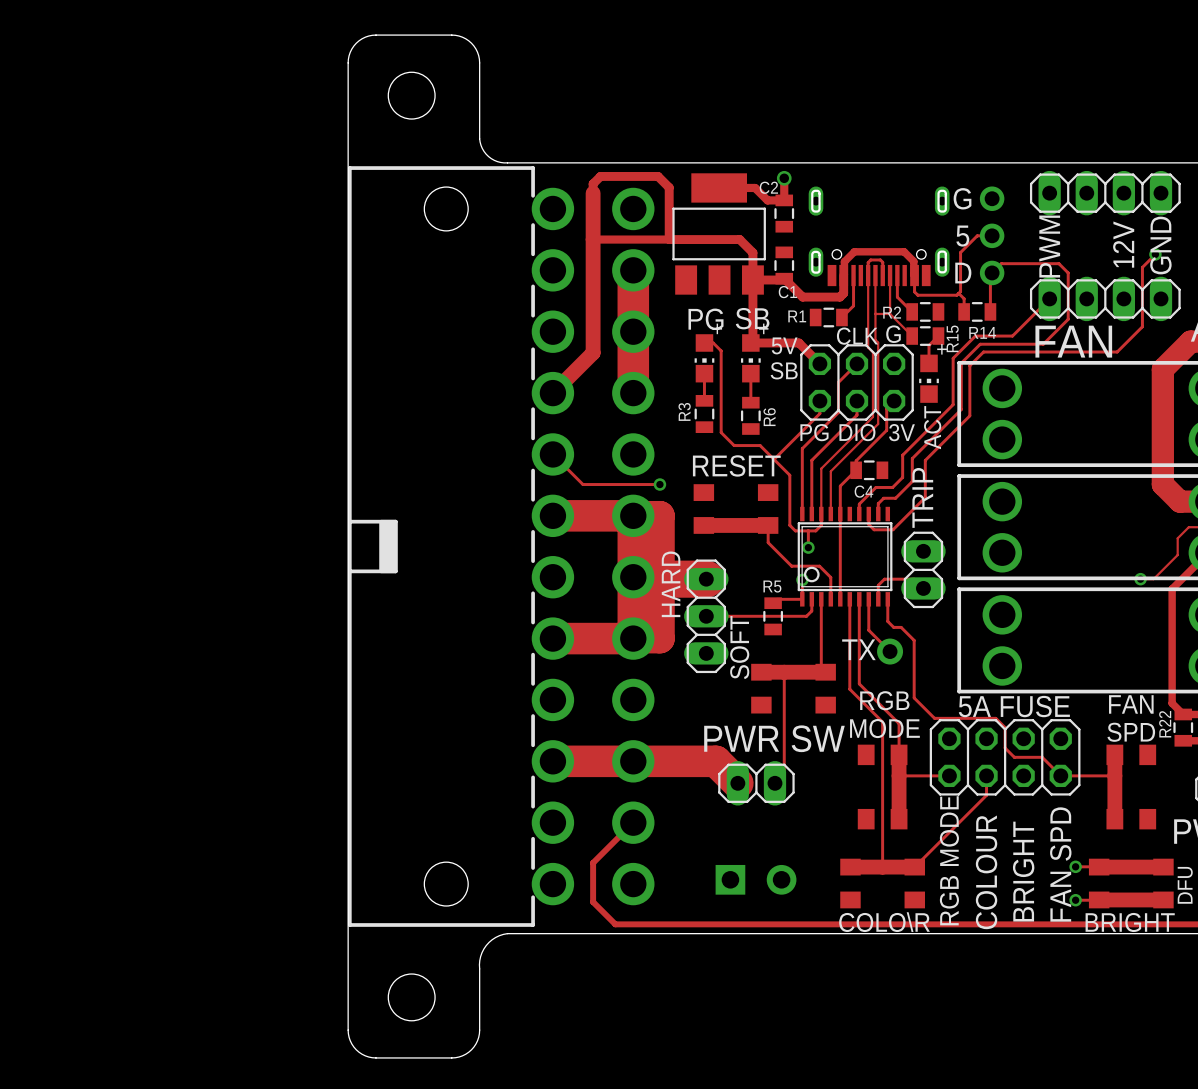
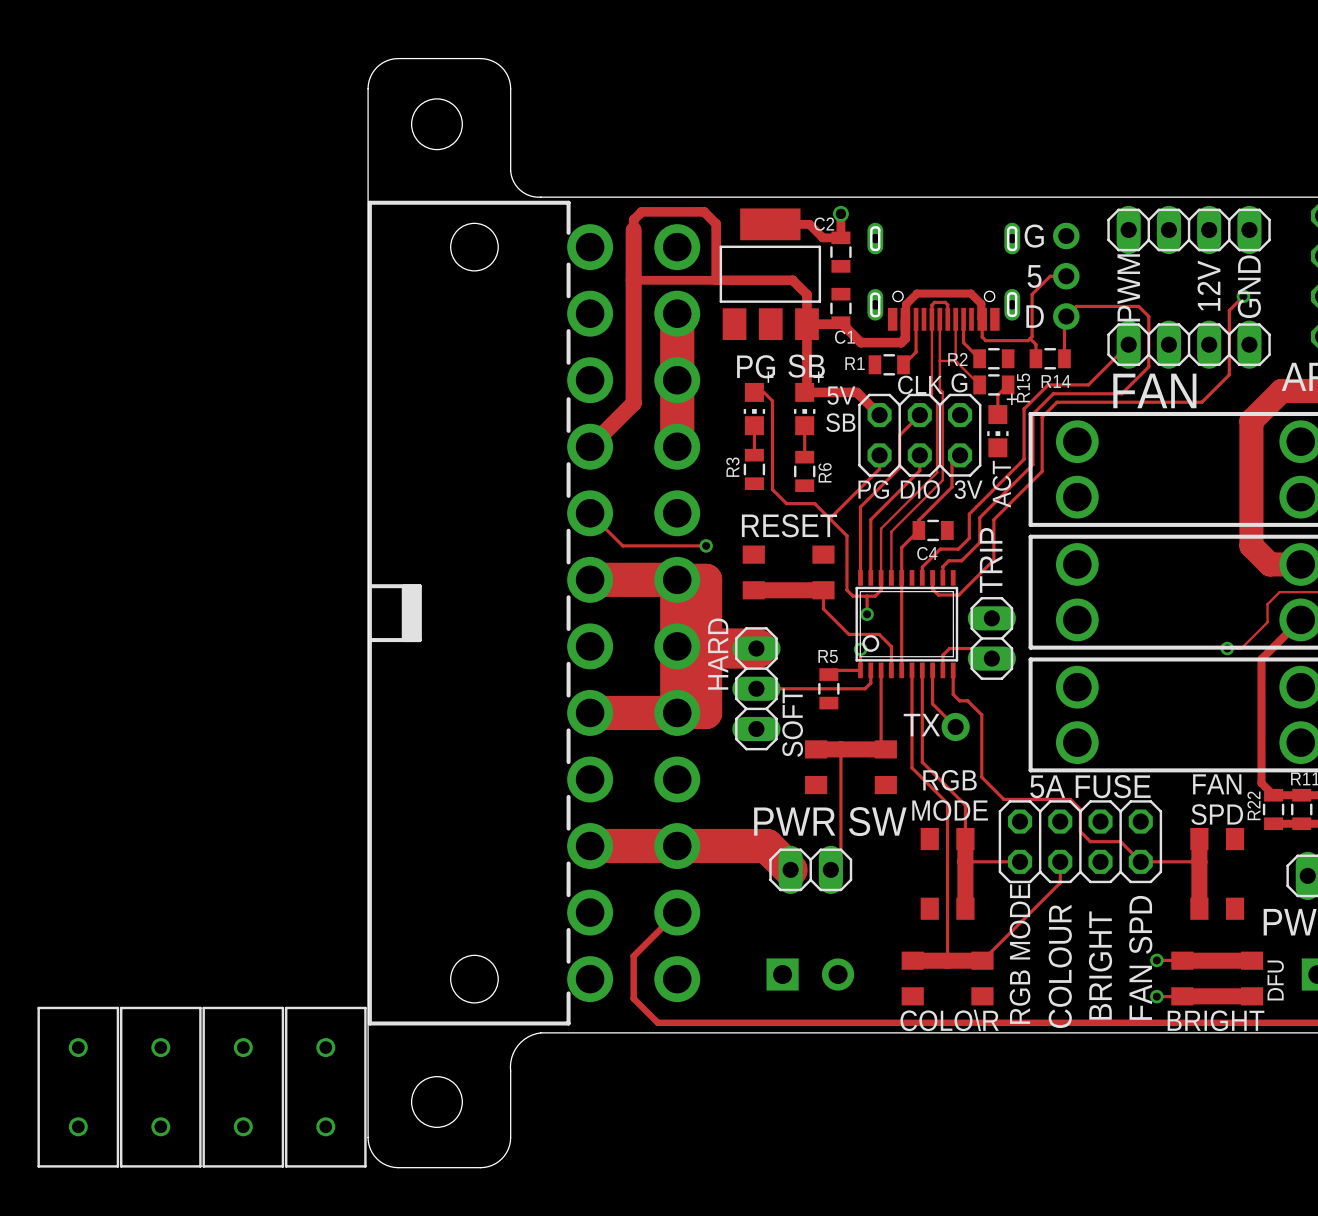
part: none -> (78, 1087)
part: none -> (160, 1087)
part: none -> (243, 1087)
part: none -> (325, 1087)

